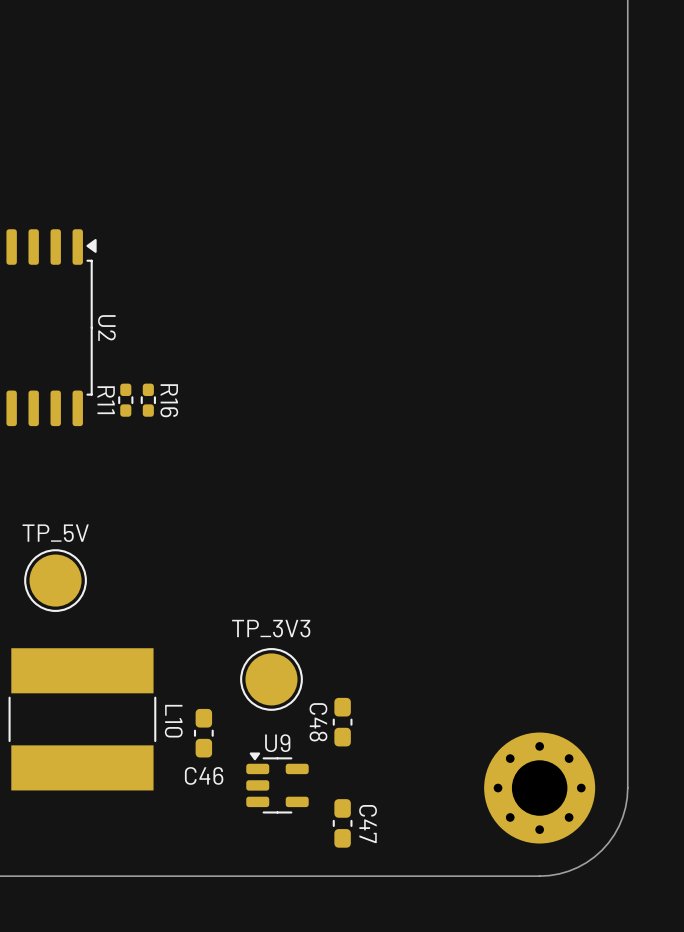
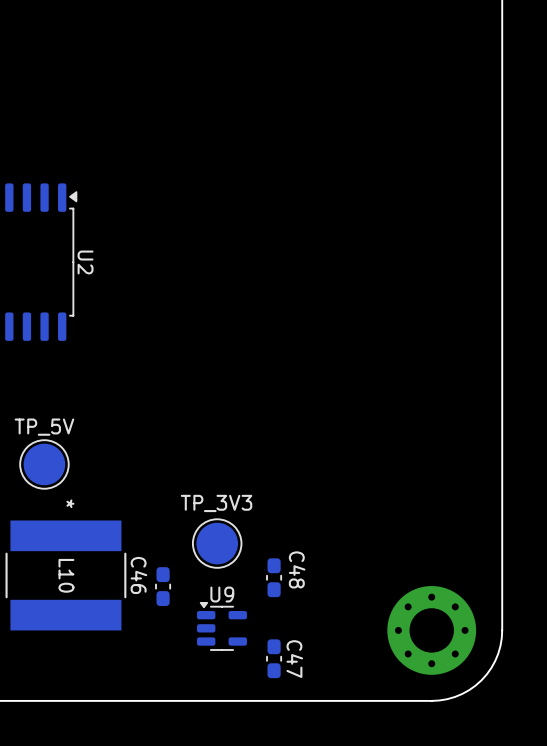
R11: (125, 400) -> none
R16: (148, 400) -> none
L10 footprint: [8, 648, 157, 791] -> [5, 520, 127, 631]
L10 name position: L10 (173, 721) -> L10 (66, 575)
C48 name position: C48 (318, 722) -> C48 (297, 569)
C46 name rotation: 0° (204, 775) -> 90° clockwise (138, 575)
C46 name position: C46 (204, 775) -> C46 (138, 575)

